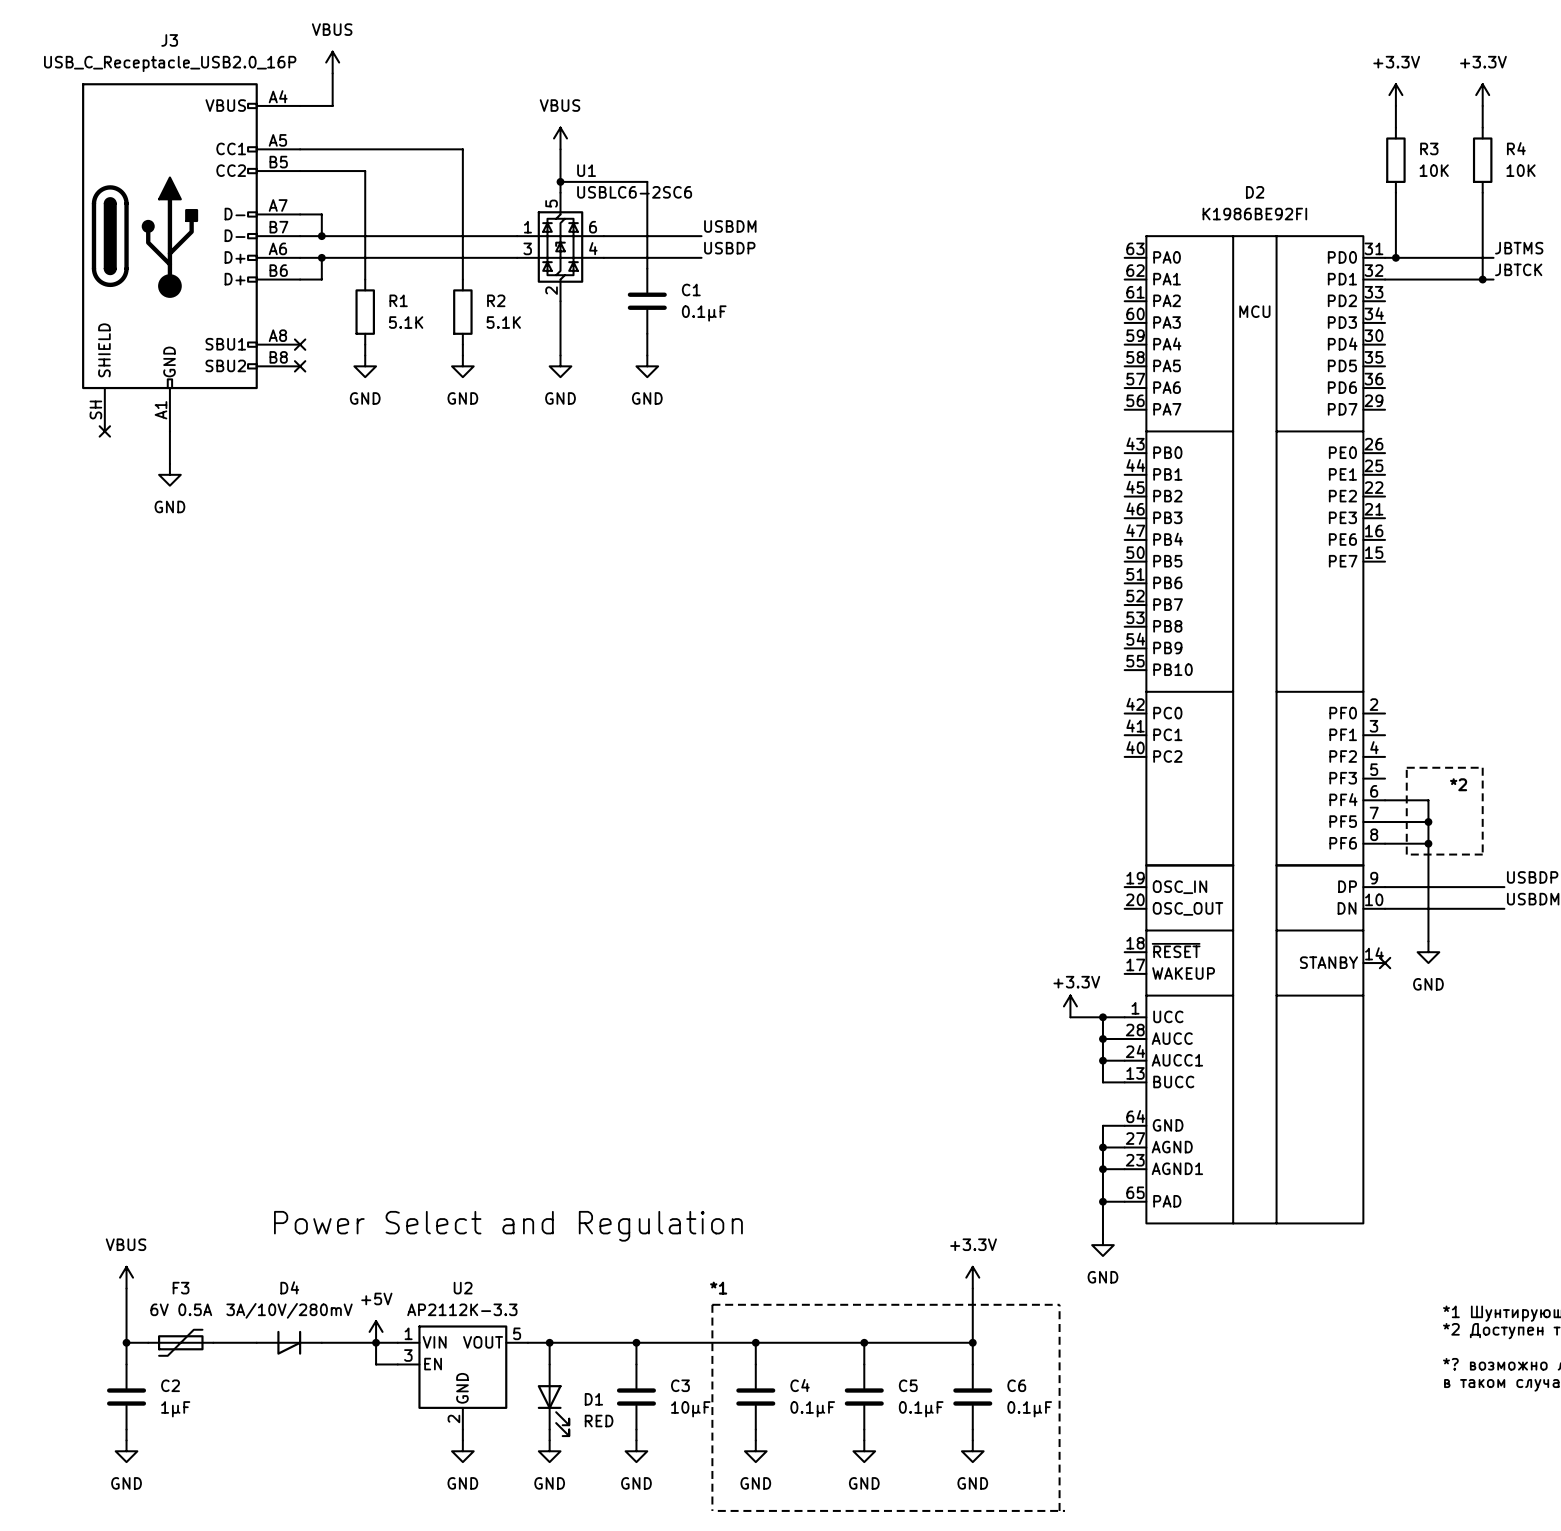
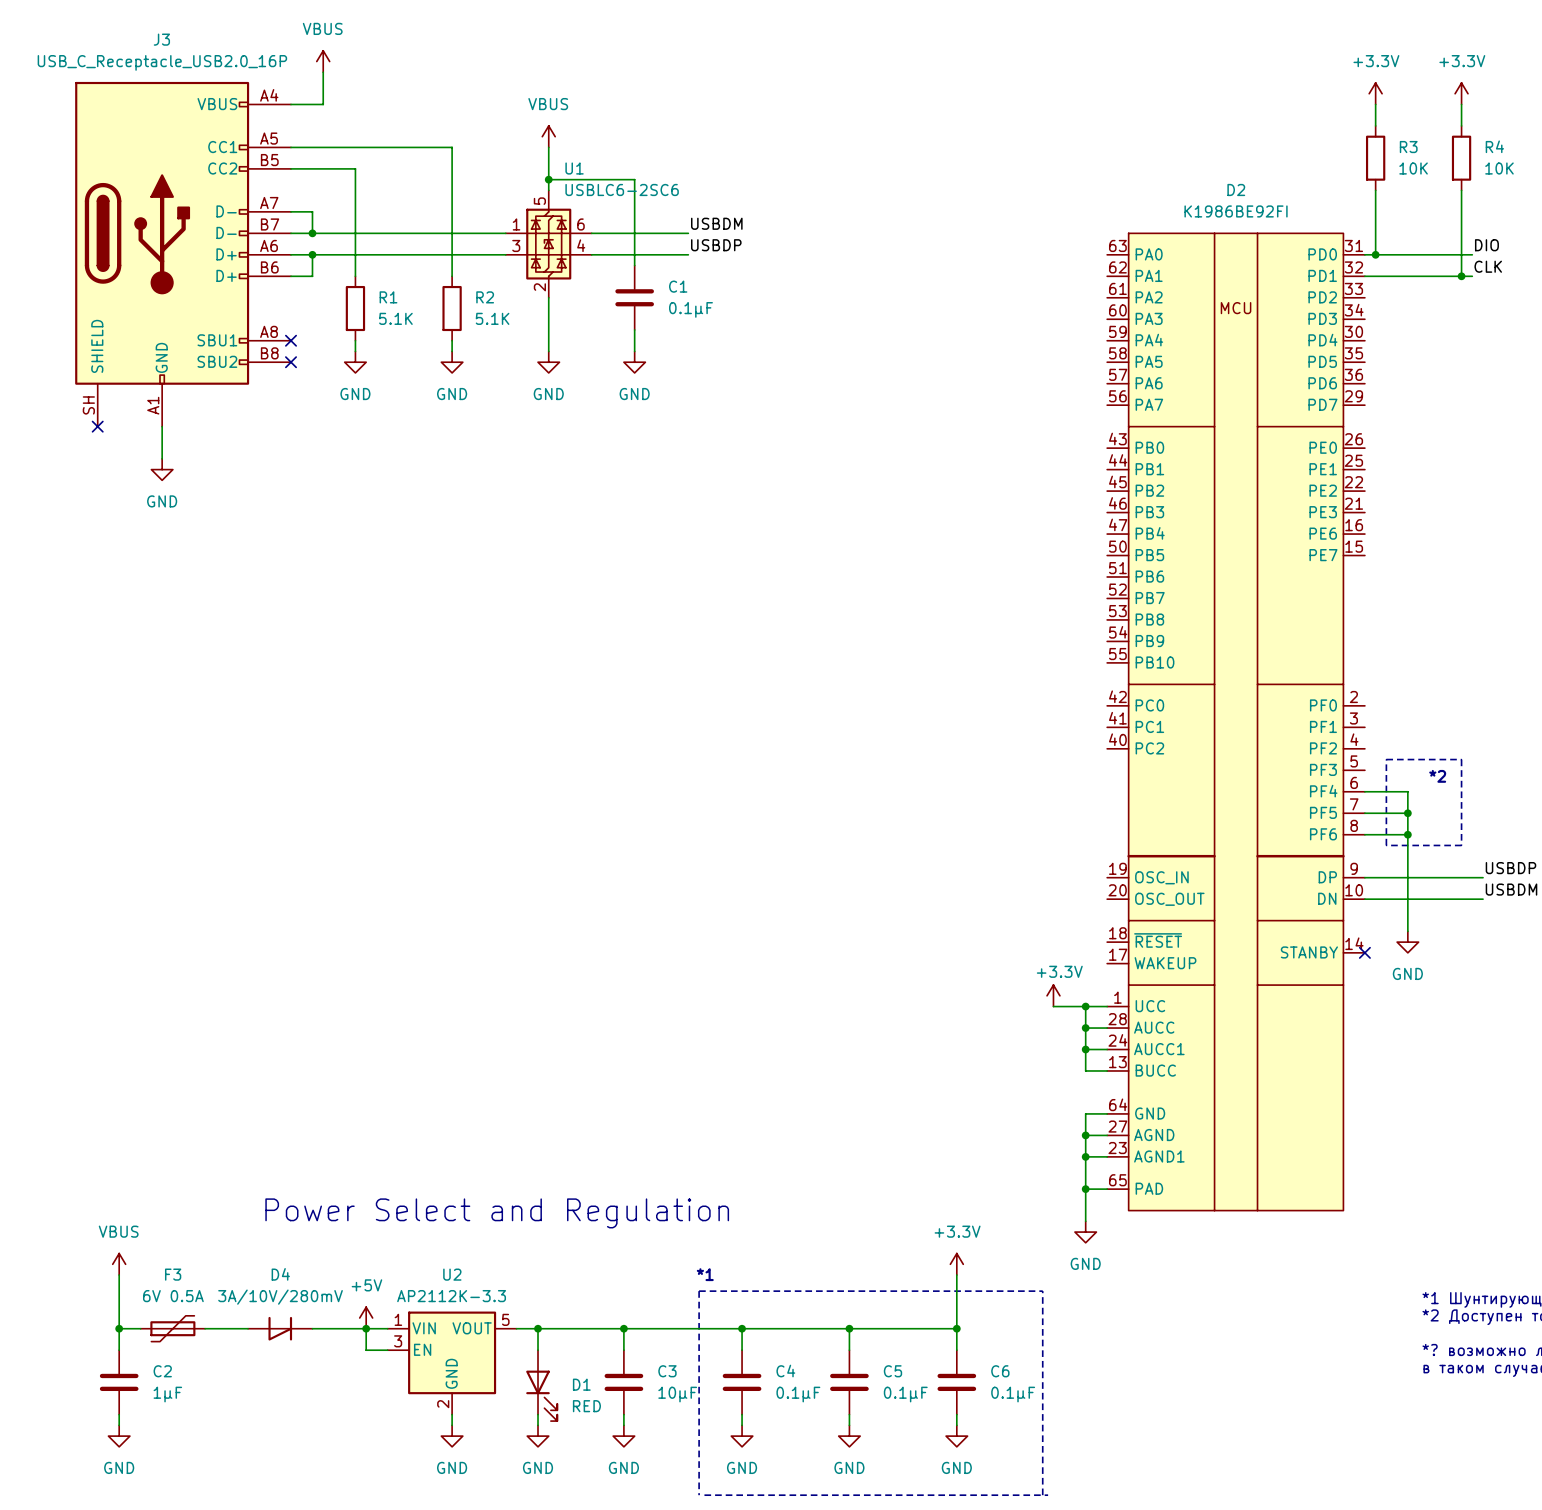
label: JBTMS (1519, 248) -> DIO (1486, 245)
label: JBTCK (1518, 269) -> CLK (1488, 266)

